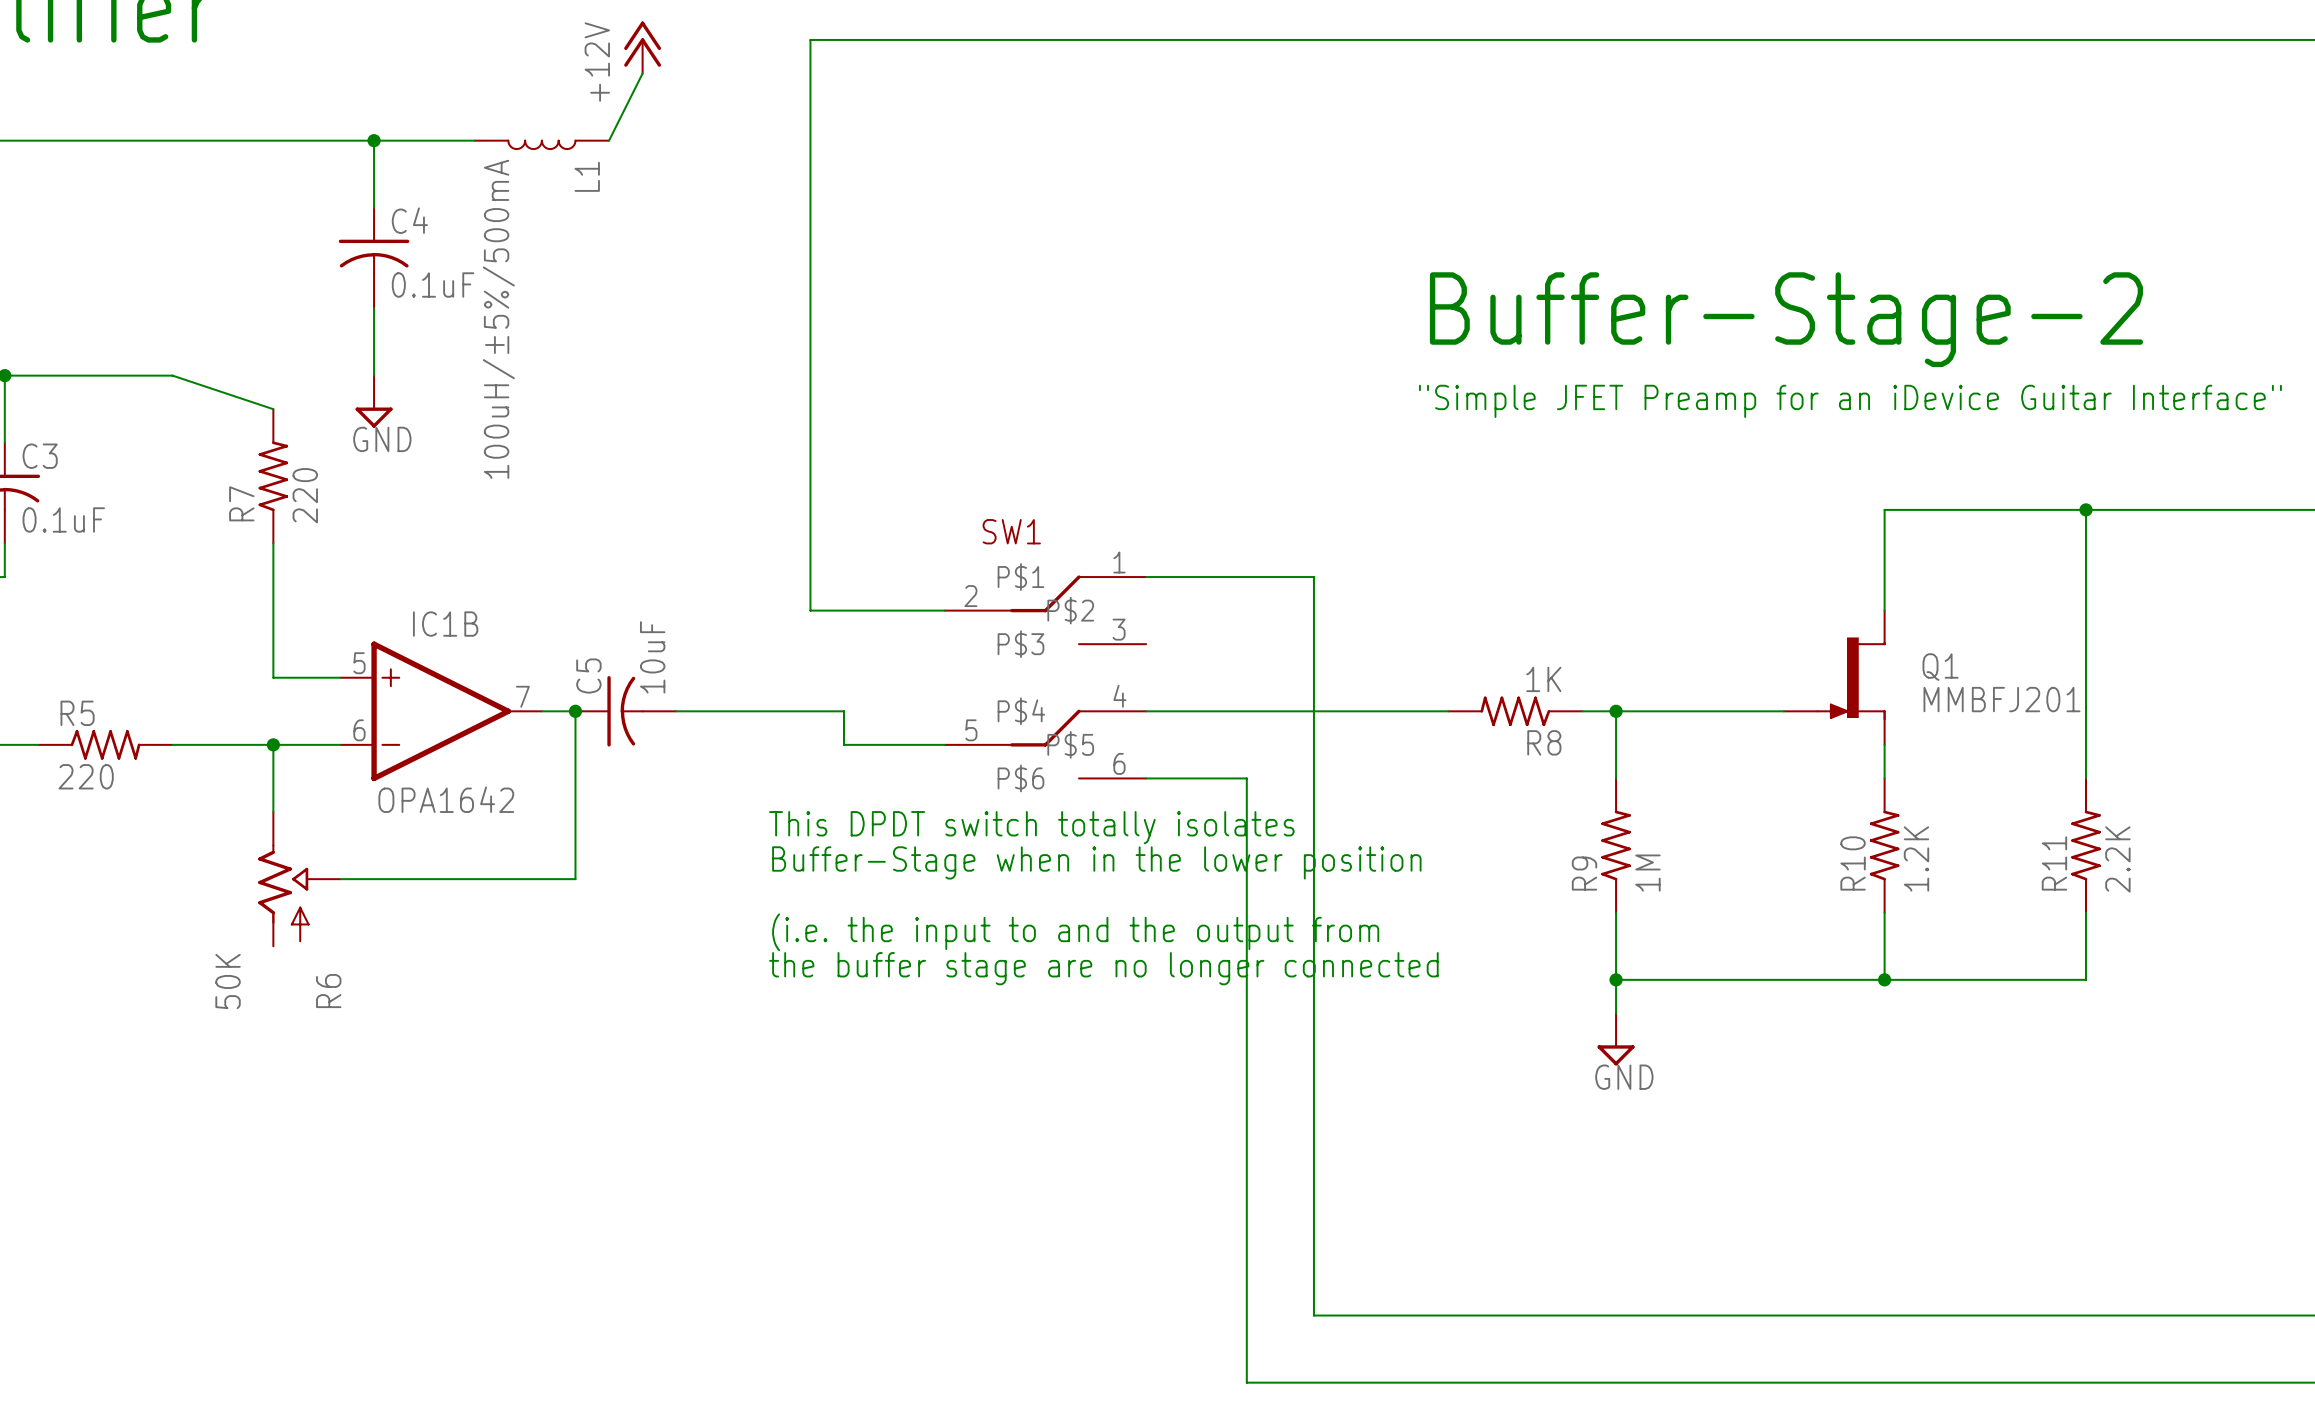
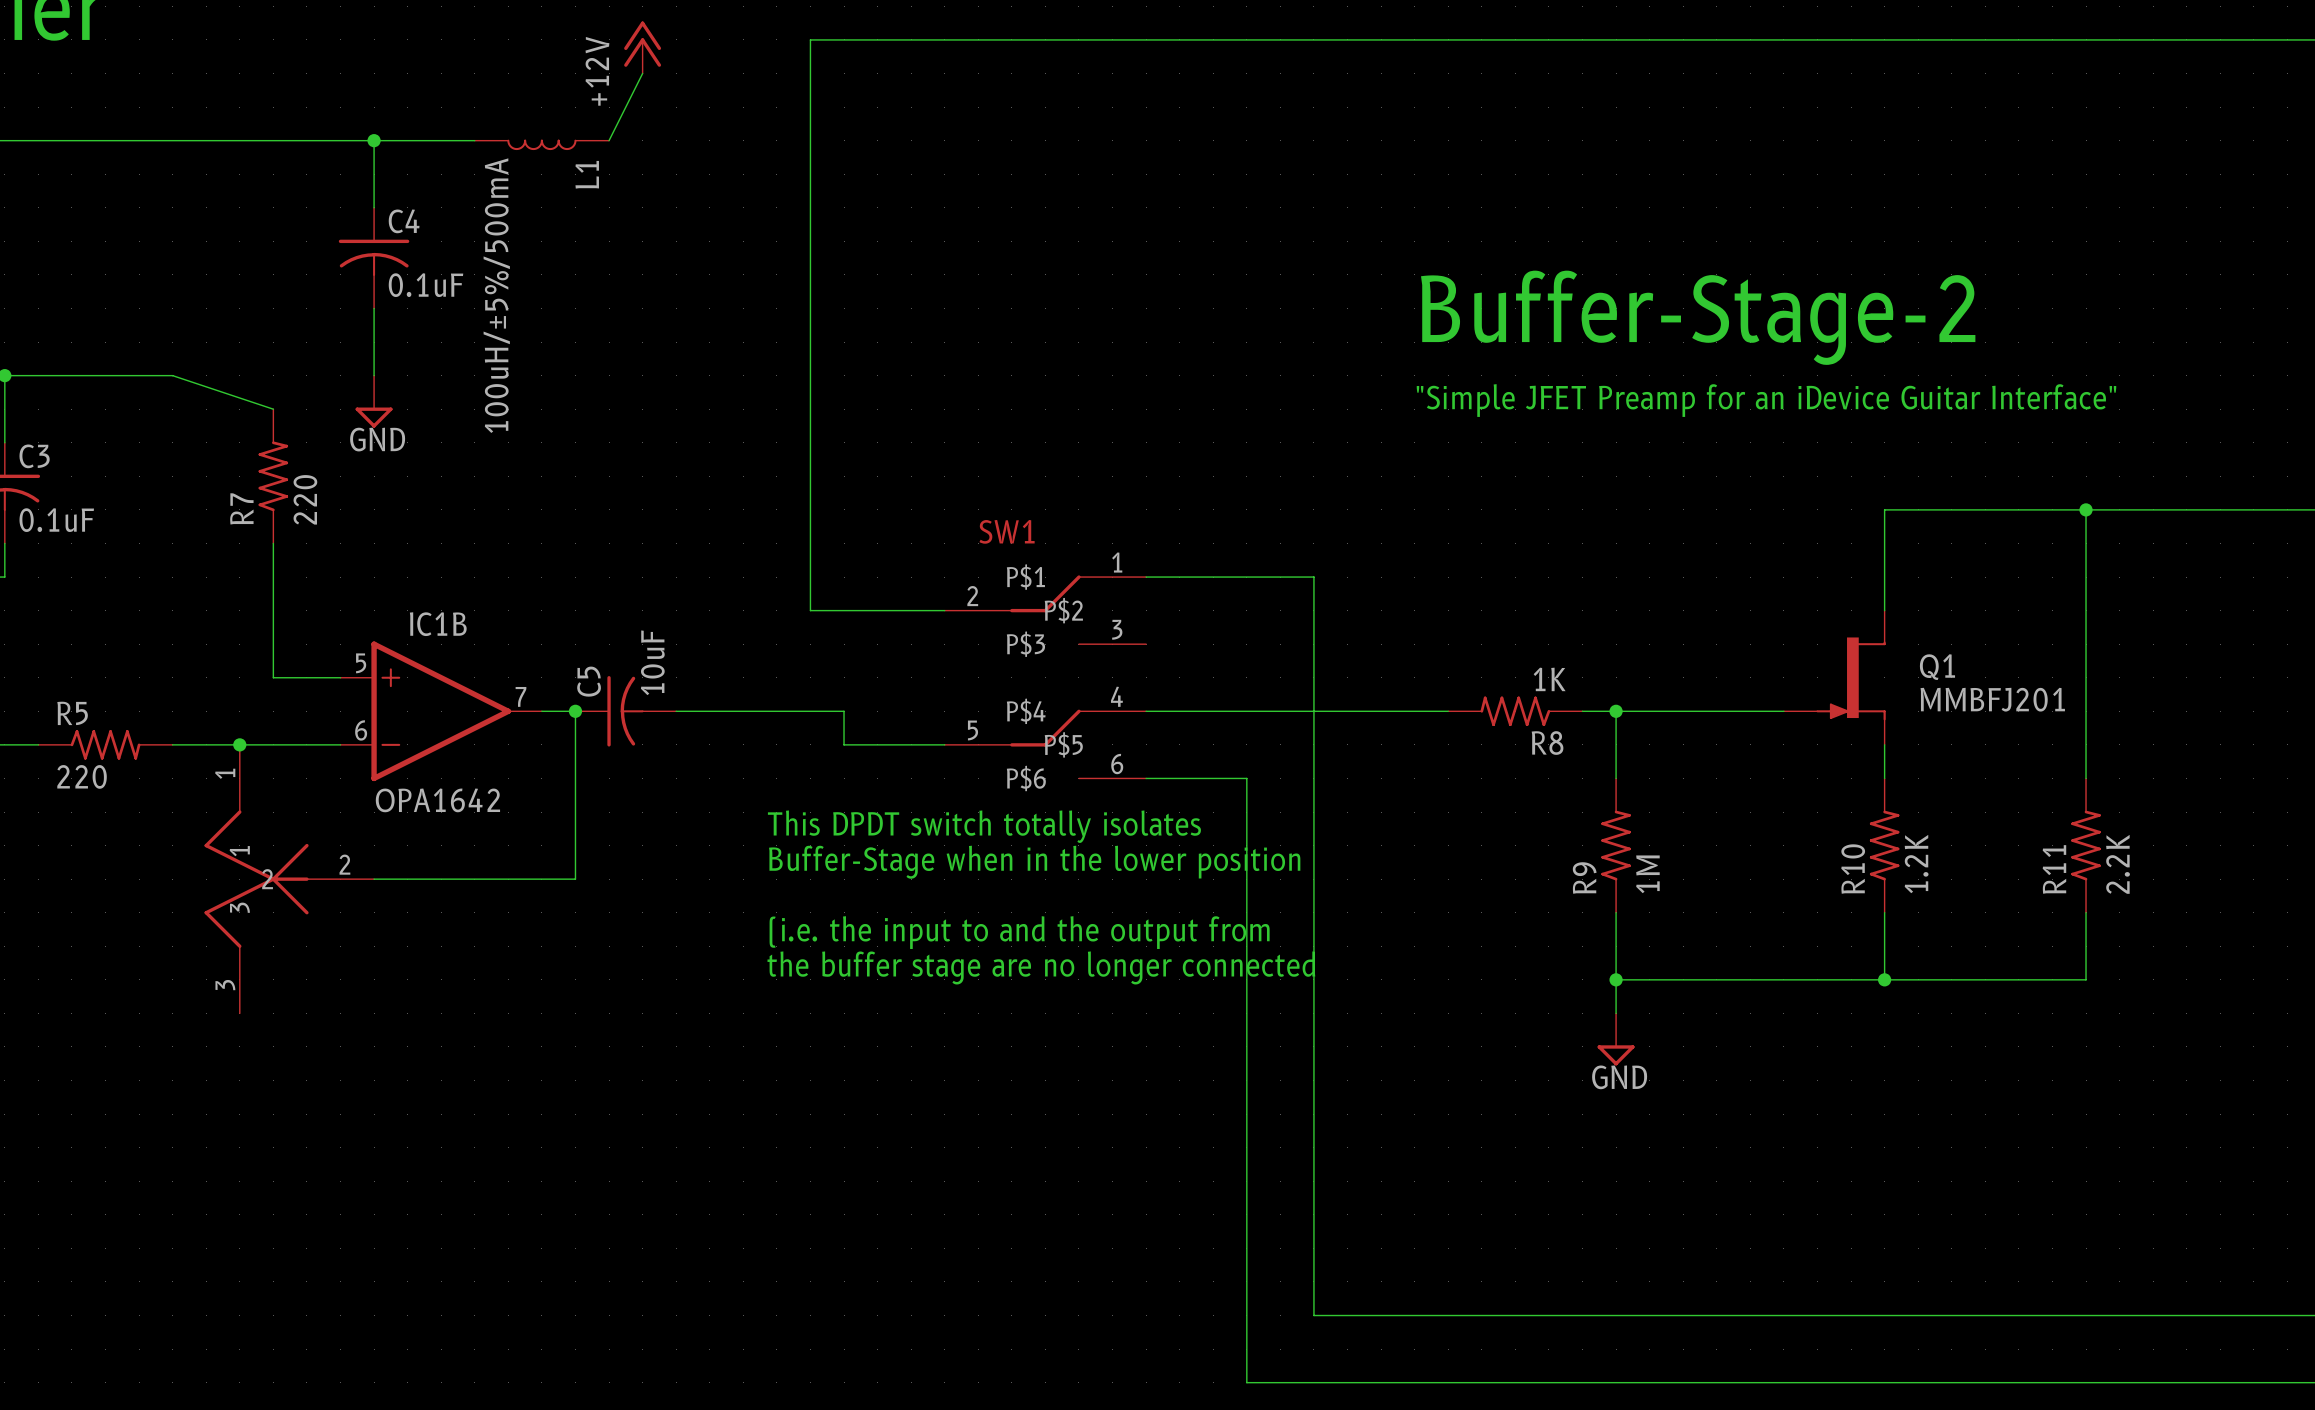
wire: (273, 744) (273, 812) -> none
junction position: (273, 744) -> (239, 744)
part: none -> (289, 879)
R6: 50K (299, 879) -> none

